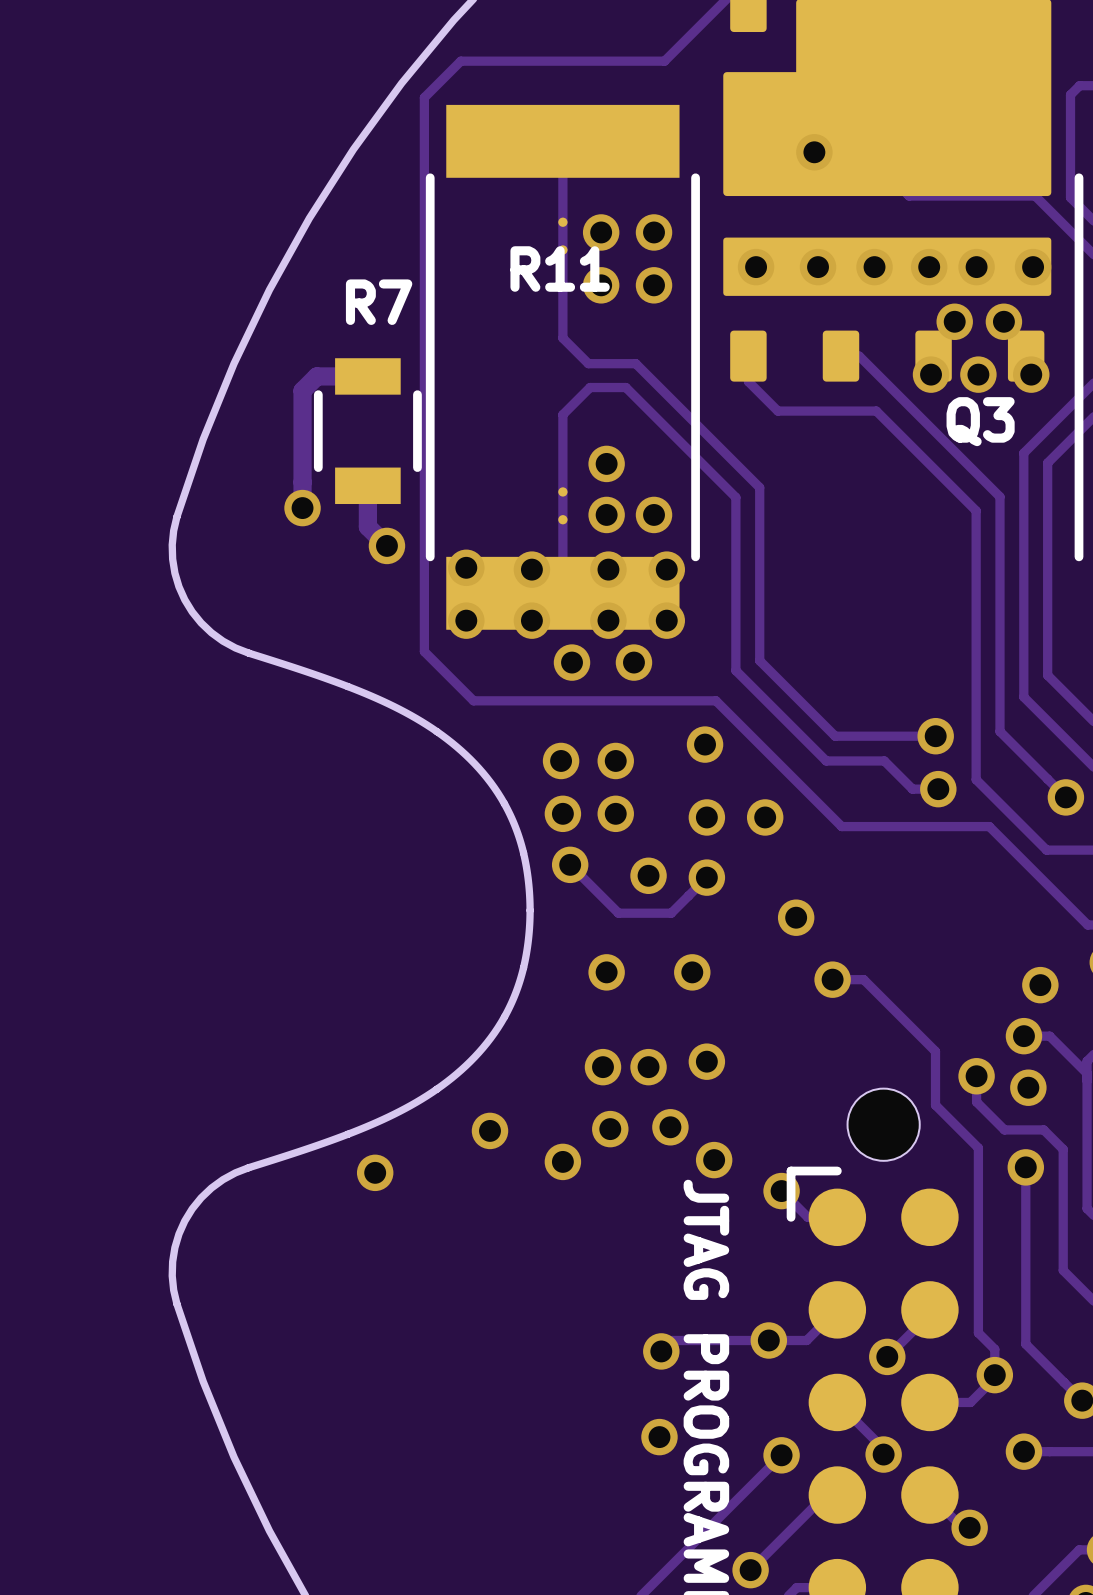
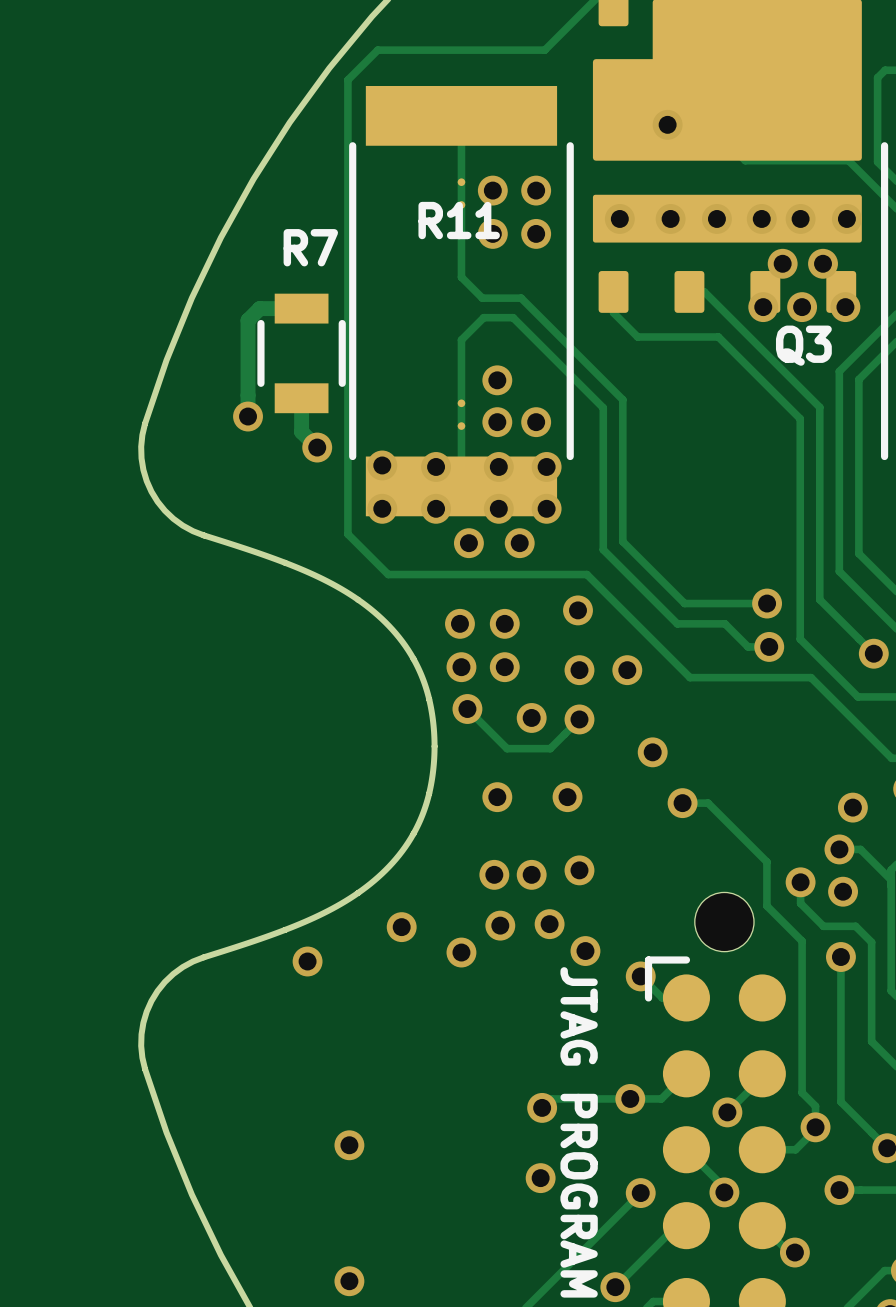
via: none -> (349, 1145)
via: none -> (349, 1281)

